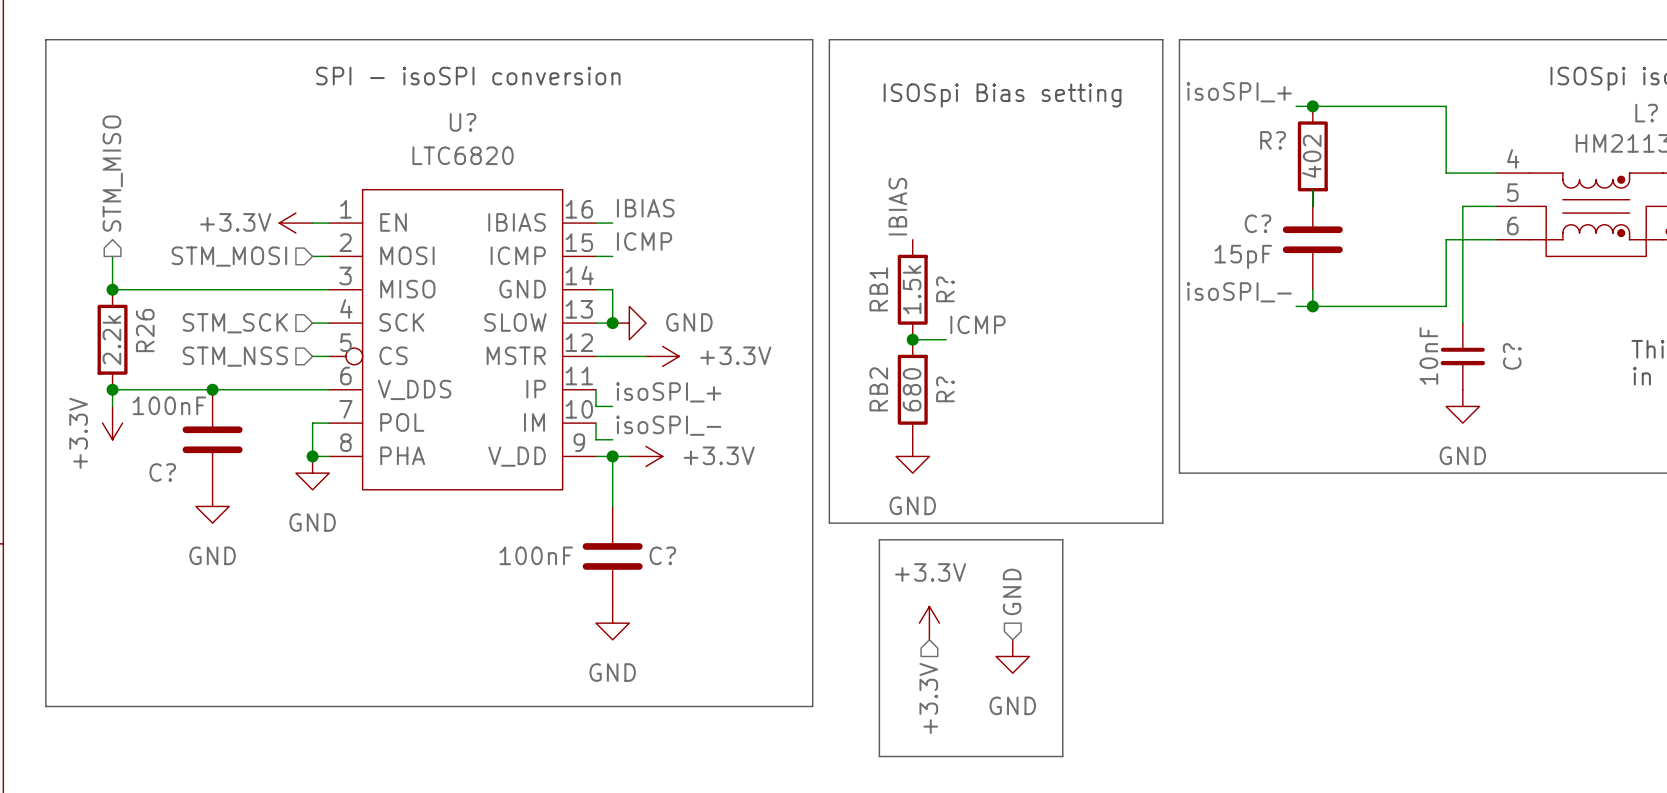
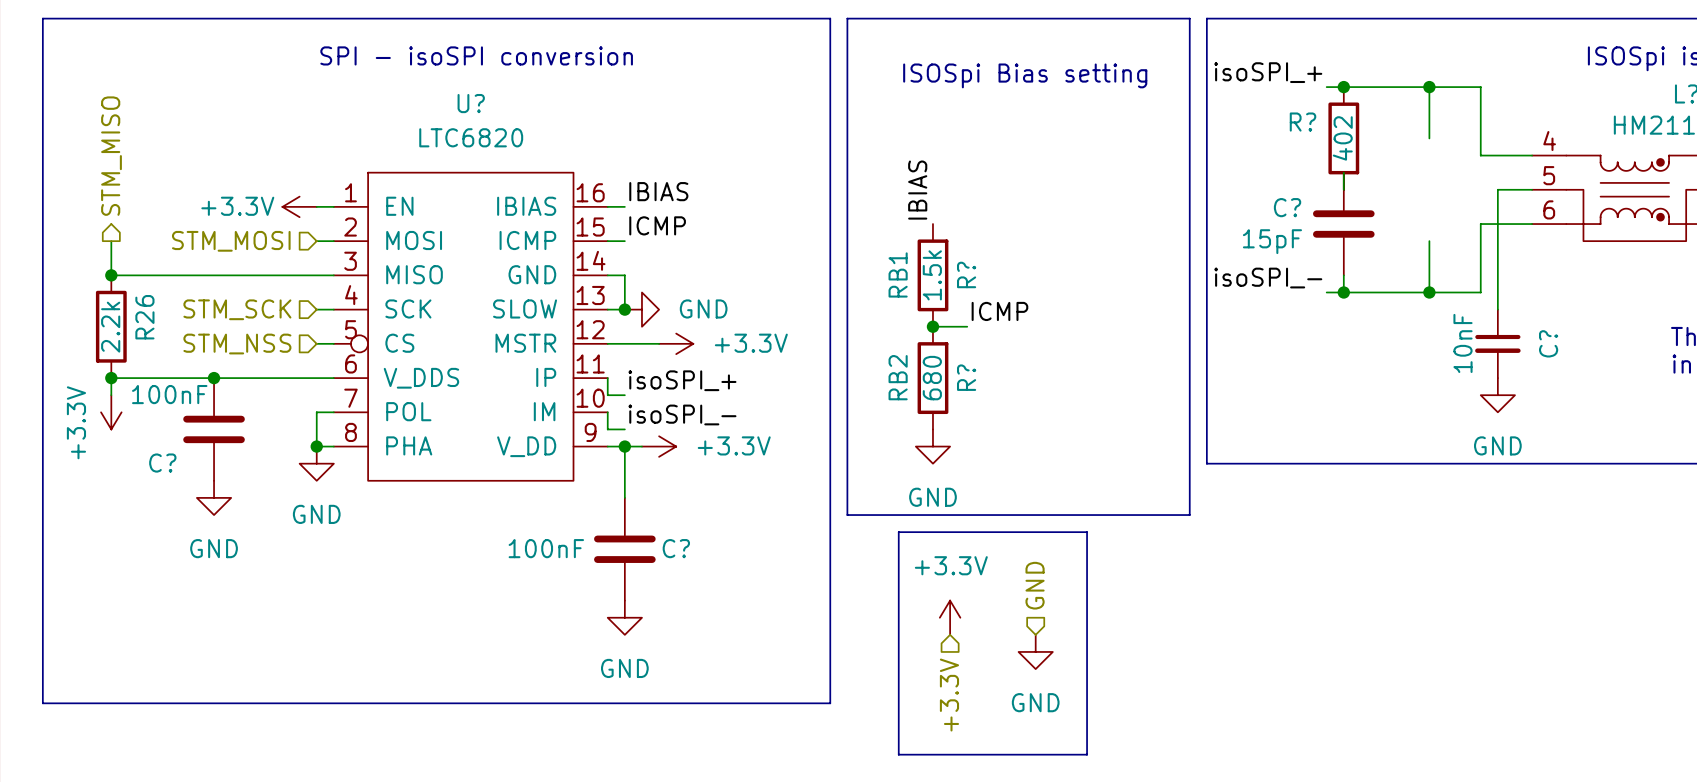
wire: none -> (1429, 87) (1429, 138)
junction: none -> (1429, 87)
wire: none -> (1429, 241) (1429, 292)
junction: none -> (1429, 292)

